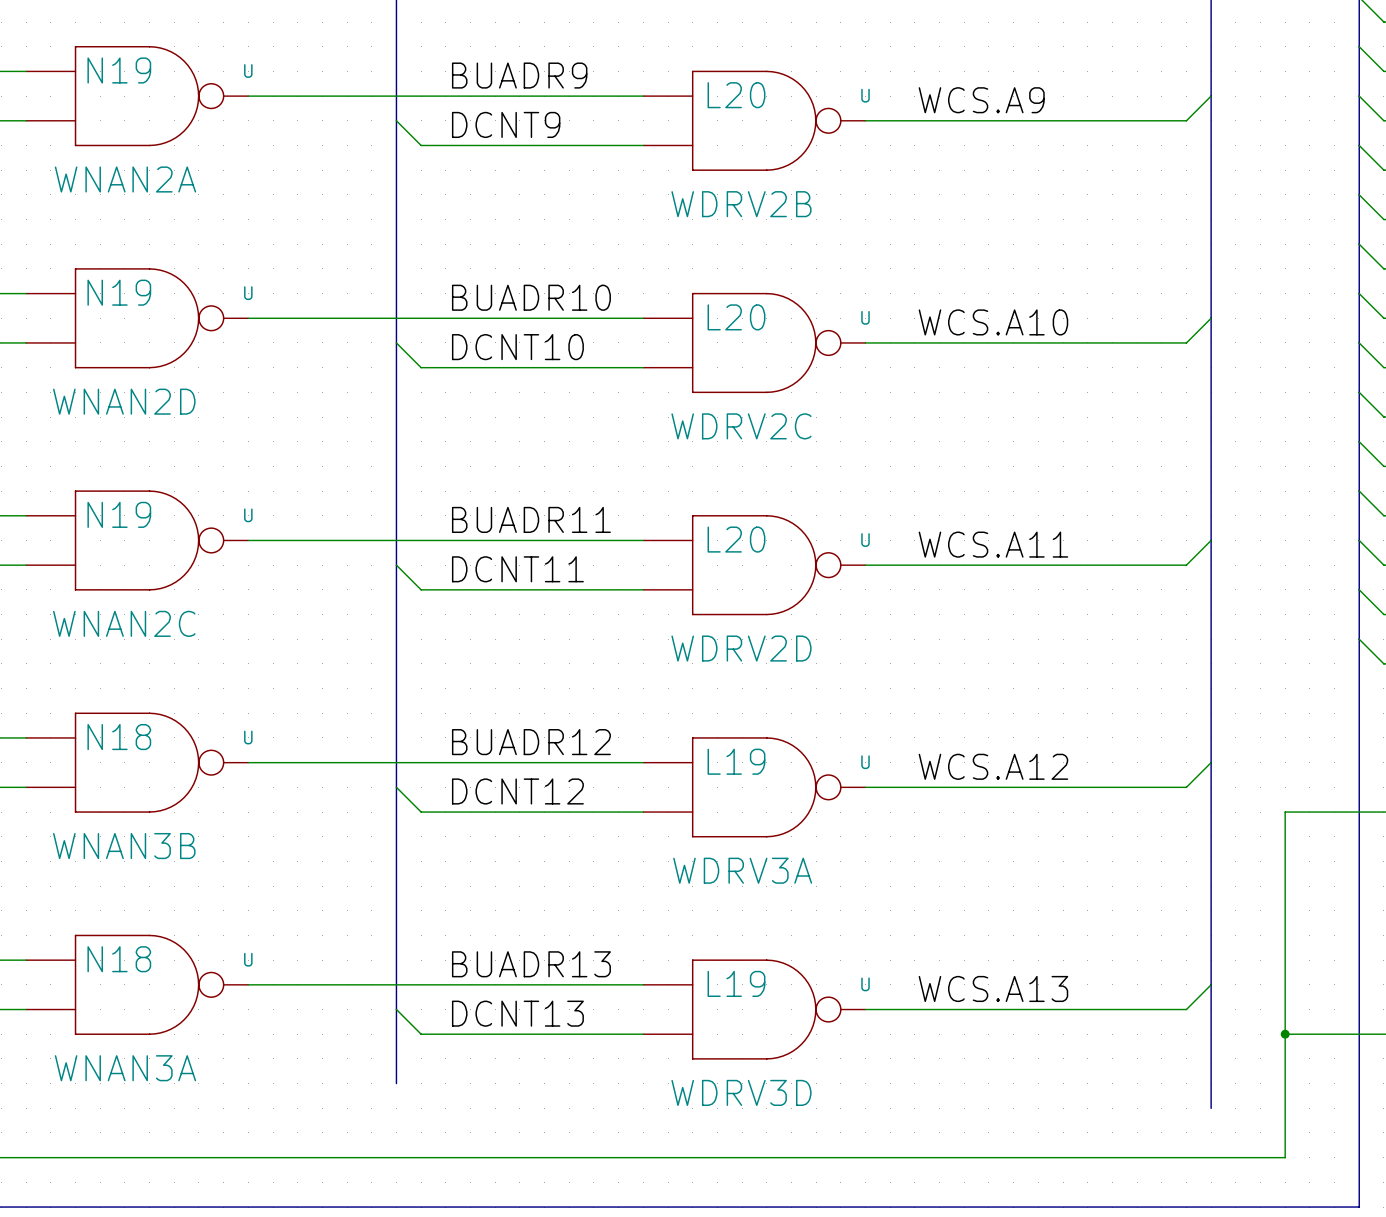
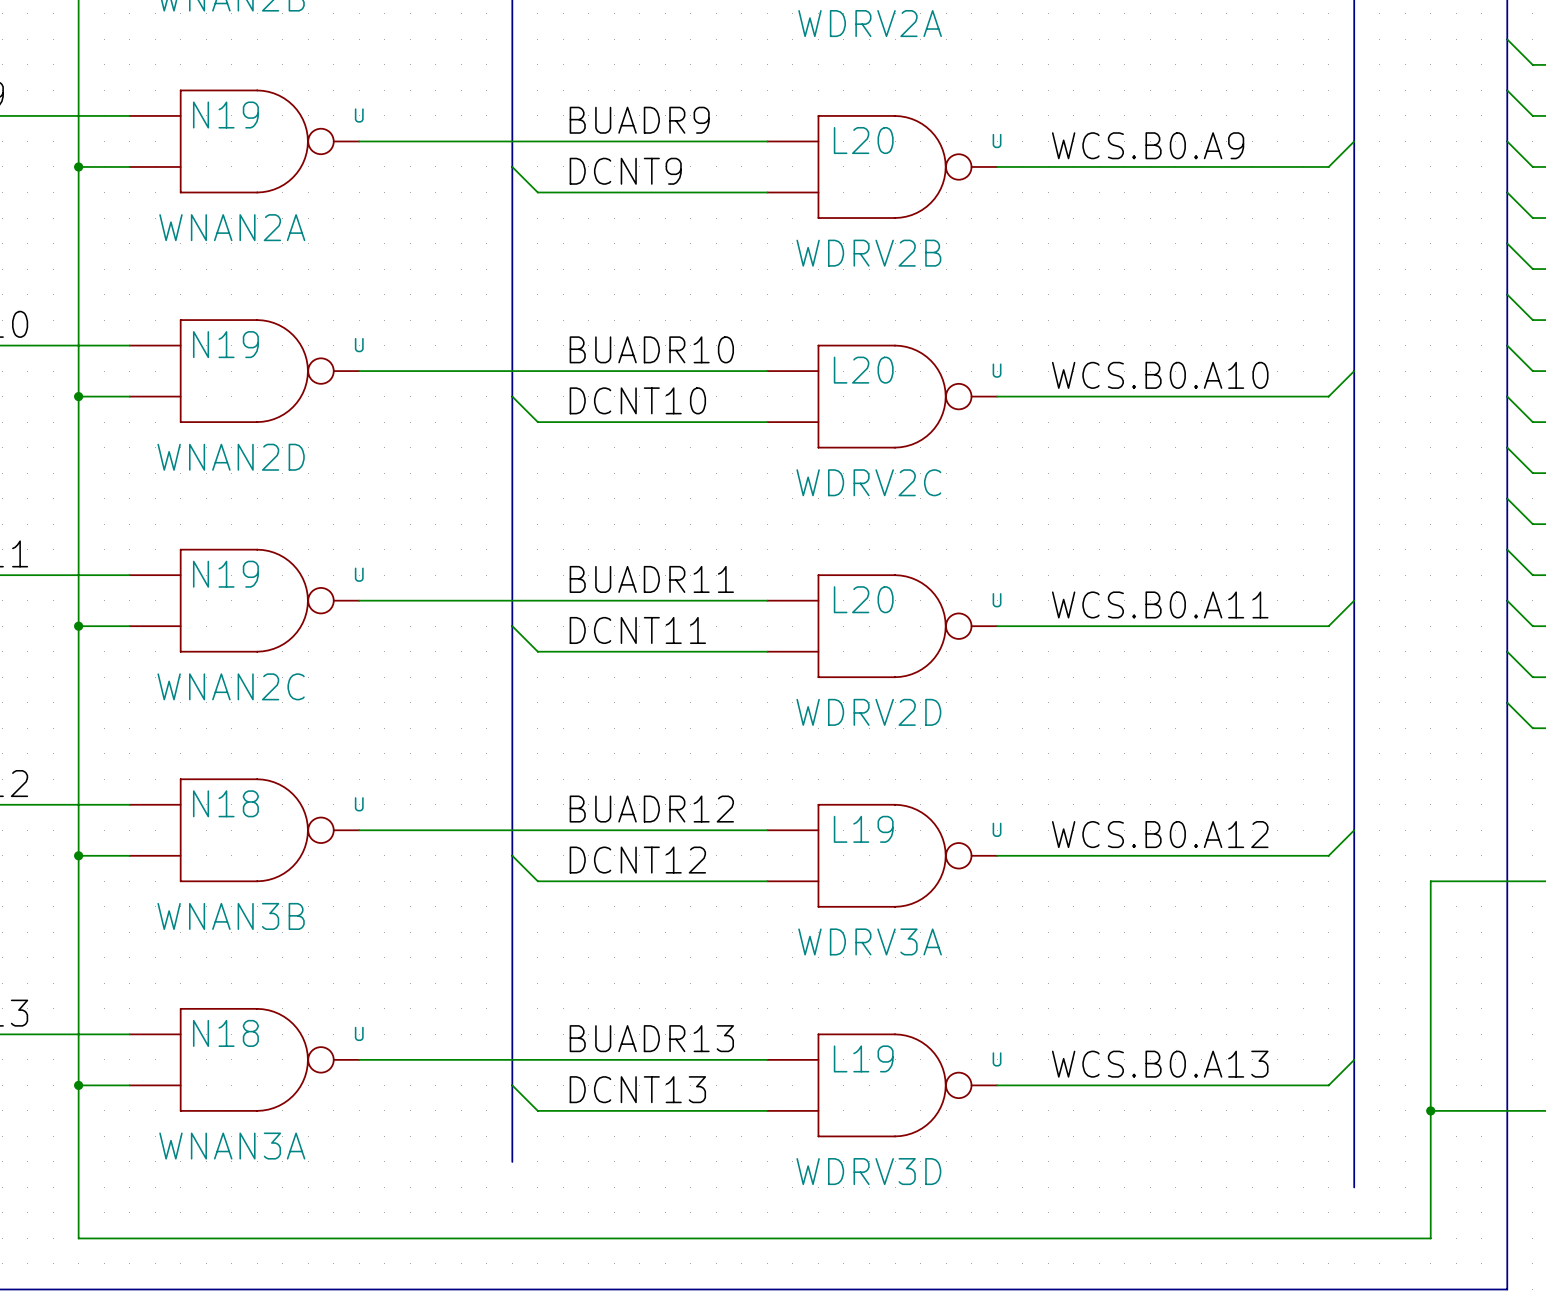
label: WCS.A9 (981, 100) -> WCS.B0.A9 (1148, 145)
label: WCS.A10 (993, 322) -> WCS.B0.A10 (1160, 375)
label: WCS.A11 (993, 544) -> WCS.B0.A11 (1160, 604)
label: WCS.A12 (993, 766) -> WCS.B0.A12 (1160, 834)
label: WCS.A13 (993, 988) -> WCS.B0.A13 (1160, 1064)

